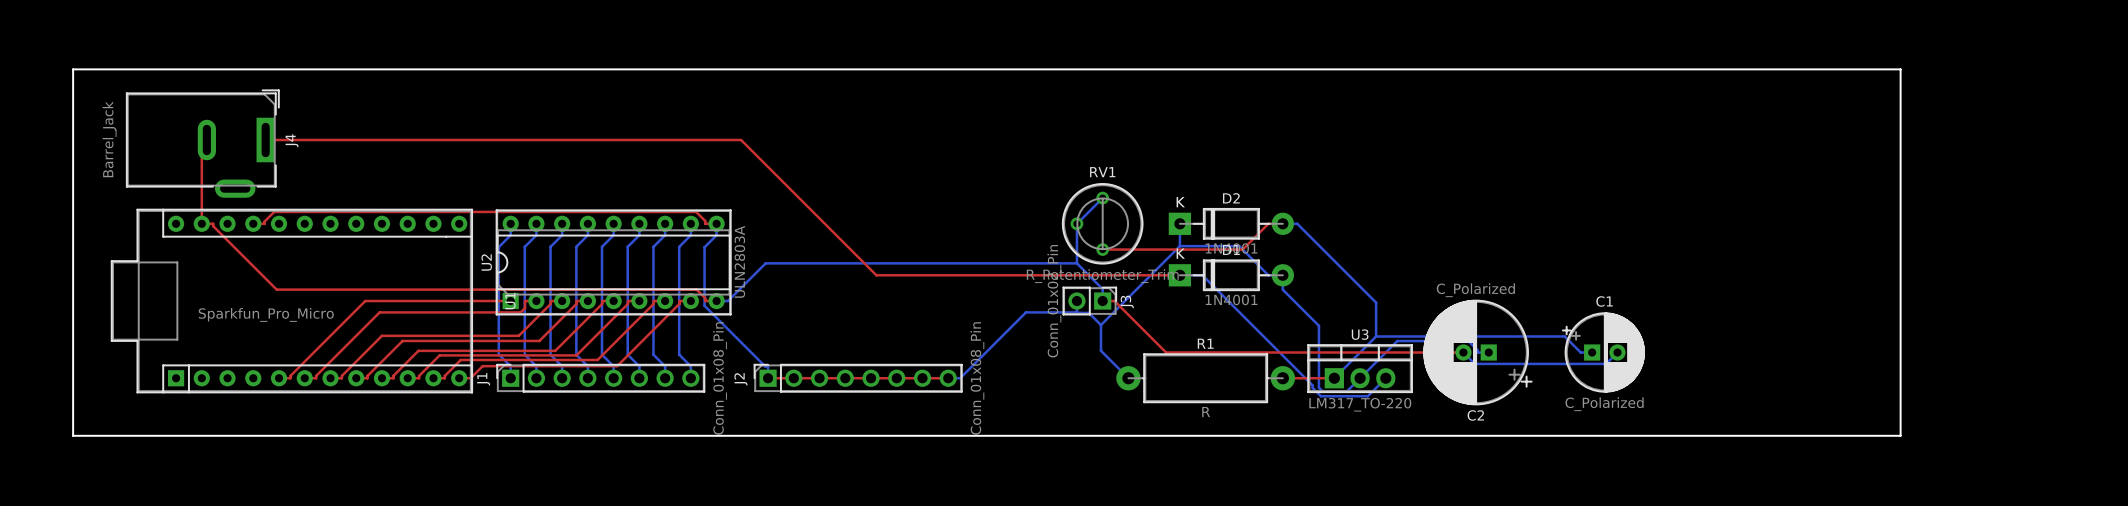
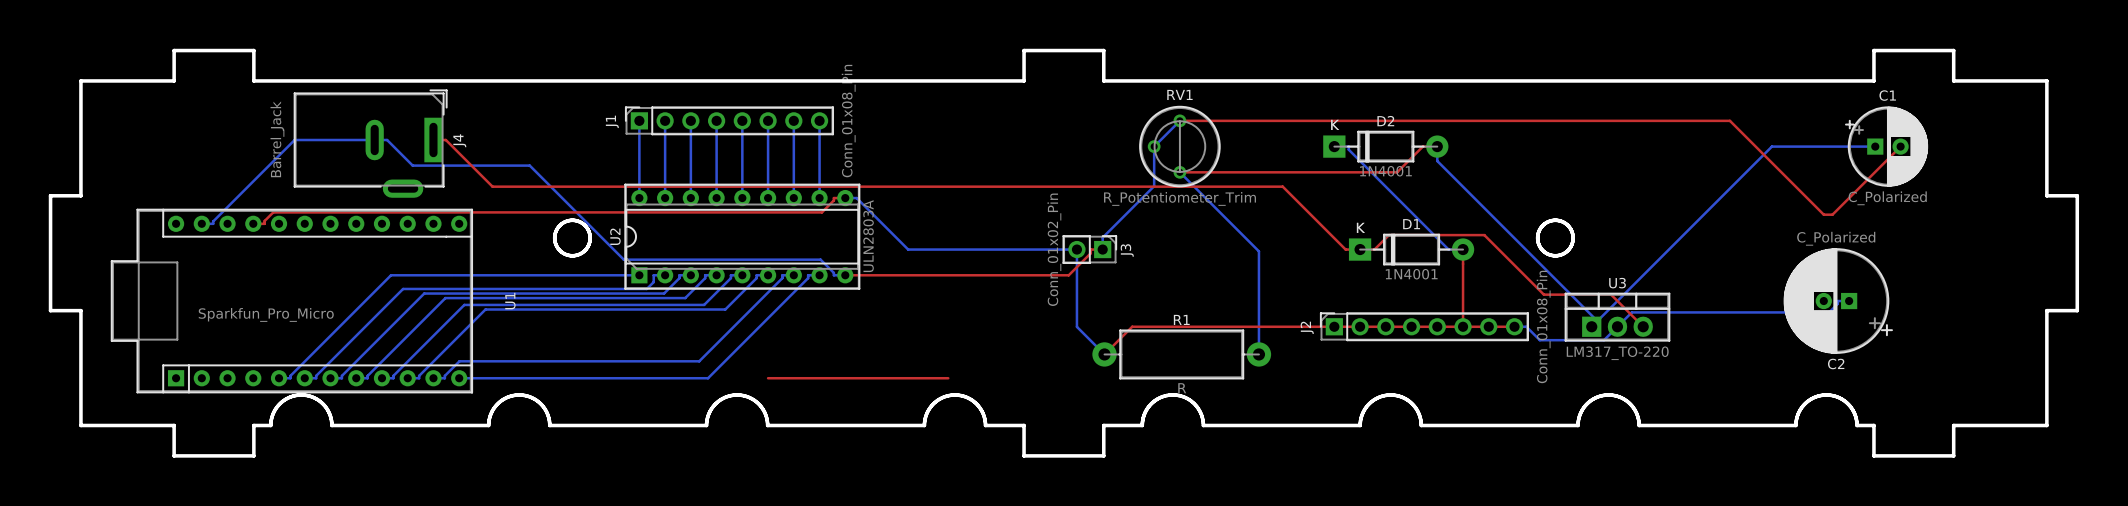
board edge: (73, 69) (1900, 69) (1900, 435) (73, 435) (73, 69) -> (174, 50) (174, 80) (80, 80) (80, 195) (50, 195) (50, 310) (80, 310) (80, 425) (174, 425) (174, 455) (253, 455) (253, 425) (270, 425) (273, 413) (279, 403) (289, 397) (301, 395) (313, 397) (322, 403) (329, 413) (331, 425) (488, 425) (491, 413) (497, 403) (507, 397) (519, 395) (531, 397) (540, 403) (547, 413) (549, 425) (706, 425) (708, 413) (715, 403) (725, 397) (737, 395) (748, 397) (758, 403) (765, 413) (767, 425) (924, 425) (926, 413) (934, 402) (944, 396) (956, 395) (968, 398) (977, 404) (983, 415) (985, 425) (1024, 425) (1024, 455) (1103, 455) (1103, 425) (1142, 425) (1144, 413) (1151, 403) (1161, 397) (1172, 394) (1184, 397) (1194, 403) (1201, 413) (1203, 425) (1360, 425) (1362, 413) (1369, 403) (1378, 397) (1390, 395) (1402, 397) (1412, 403) (1418, 413) (1421, 425) (1578, 425) (1580, 413) (1587, 403) (1596, 397) (1608, 395) (1620, 397) (1630, 403) (1636, 413) (1639, 425) (1795, 425) (1798, 413) (1805, 402) (1817, 396) (1829, 395) (1839, 398) (1849, 404) (1855, 415) (1857, 425) (1873, 425) (1873, 455) (1953, 455) (1953, 425) (2046, 425) (2046, 310) (2077, 310) (2077, 195) (2046, 195) (2046, 80) (1953, 80) (1953, 50) (1873, 50) (1873, 80) (1103, 80) (1103, 50) (1024, 50) (1024, 80) (253, 80) (253, 50) (174, 50)
bottom track: none -> (639, 120) (639, 198)
bottom track: none -> (665, 120) (665, 198)
bottom track: none -> (690, 120) (690, 198)
bottom track: none -> (716, 120) (716, 198)
bottom track: none -> (742, 120) (742, 198)
bottom track: none -> (768, 120) (768, 198)
bottom track: none -> (793, 120) (793, 198)
bottom track: none -> (819, 120) (819, 198)
top track: none -> (1179, 120) (1729, 120) (1823, 214) (1832, 214) (1900, 146)
bottom track: none -> (1179, 120) (1154, 146) (1154, 186) (1102, 237) (1102, 249)
top track: (201, 140) (201, 223) (213, 223) (213, 226) (276, 289) (696, 289) (705, 298) (705, 301) (716, 301) -> none
top track: (265, 140) (433, 140) -> none
top track: (445, 140) (741, 140) (876, 275) -> (845, 275) (876, 275)
top track: none -> (445, 140) (492, 186) (1282, 186) (1345, 249) (1374, 249) (1388, 235) (1484, 235) (1543, 294) (1611, 294) (1643, 326)
J4 position: (202, 143) -> (370, 143)
bottom track: none -> (1334, 146) (1348, 146) (1348, 149) (1448, 249) (1463, 249)
top track: none -> (1437, 146) (1422, 146) (1397, 172) (1179, 172)
bottom track: none -> (1437, 146) (1437, 161) (1597, 321)
bottom track: none -> (1875, 146) (1771, 146) (1591, 326)
bottom track: none -> (1179, 172) (1258, 251) (1258, 354)
bottom track: (1102, 198) (1076, 223) (1076, 249) -> (845, 198) (856, 198) (908, 249) (1076, 249)
board edge: none -> (571, 220) (559, 226) (554, 238) (560, 251) (573, 255) (585, 249) (590, 237) (584, 224) (571, 220)
board edge: none -> (1554, 220) (1542, 226) (1537, 238) (1543, 251) (1556, 255) (1568, 249) (1573, 237) (1567, 224) (1554, 220)
top track: (264, 221) (274, 211) (696, 211) (705, 220) (705, 223) (716, 223) -> (264, 221) (273, 212) (821, 212) (833, 200) (833, 198) (845, 198)
bottom track: none -> (201, 223) (213, 223) (213, 221) (294, 140) (387, 140) (412, 165) (529, 165) (623, 259) (820, 259) (833, 272) (833, 275) (845, 275)
bottom track: (510, 223) (510, 235) (498, 247) (498, 354) (510, 366) (510, 378) -> none
bottom track: (536, 223) (536, 235) (524, 246) (524, 354) (536, 366) (536, 378) -> none
bottom track: (562, 223) (562, 235) (550, 246) (550, 354) (562, 366) (562, 378) -> none
bottom track: (587, 223) (587, 235) (576, 246) (576, 354) (587, 366) (587, 378) -> none
bottom track: (613, 223) (613, 235) (601, 246) (601, 354) (613, 366) (613, 378) -> none
bottom track: (639, 223) (639, 235) (627, 246) (627, 354) (639, 366) (639, 378) -> none
bottom track: (665, 223) (665, 235) (653, 246) (653, 354) (665, 366) (665, 378) -> none
bottom track: (690, 223) (690, 235) (679, 246) (679, 354) (690, 366) (690, 378) -> none
bottom track: (716, 223) (716, 235) (704, 247) (704, 305) (765, 366) (768, 366) (768, 378) -> none
RV1 position: (1102, 223) -> (1179, 146)
bottom track: (1179, 223) (1179, 246) -> none
D2 position: (1231, 223) -> (1385, 146)
top track: (1282, 223) (1268, 223) (1242, 249) (1102, 249) -> none
bottom track: (1282, 223) (1297, 223) (1376, 302) (1376, 336) -> none
bottom track: (1179, 246) (1239, 246) (1268, 275) (1282, 275) (1282, 289) (1318, 325) (1318, 387) (1322, 391) (1346, 391) (1397, 341) (1468, 341) (1477, 350) (1477, 352) (1488, 352) -> none
bottom track: (1179, 246) (1100, 325) -> none
top track: none -> (1463, 249) (1463, 326)
U2 position: (613, 262) -> (742, 236)
bottom track: none -> (1076, 263) (1076, 301)
bottom track: none -> (639, 275) (391, 275) (290, 375) (290, 378) (279, 378)
bottom track: none -> (665, 275) (653, 275) (653, 282) (646, 288) (403, 288) (316, 375) (316, 378) (304, 378)
bottom track: none -> (690, 275) (679, 275) (679, 278) (664, 293) (424, 293) (341, 375) (341, 378) (330, 378)
bottom track: none -> (716, 275) (705, 275) (705, 278) (685, 298) (445, 298) (367, 375) (367, 378) (356, 378)
bottom track: none -> (742, 275) (730, 275) (730, 278) (704, 304) (464, 304) (393, 375) (393, 378) (381, 378)
bottom track: none -> (768, 275) (756, 275) (756, 278) (725, 309) (485, 309) (419, 375) (419, 378) (407, 378)
bottom track: none -> (793, 275) (782, 275) (782, 278) (699, 361) (459, 361) (444, 375) (444, 378) (433, 378)
bottom track: none -> (819, 275) (808, 275) (808, 278) (708, 378) (459, 378)
top track: (1068, 275) (1179, 275) -> (1068, 275) (1090, 253) (1090, 249) (1102, 249)
bottom track: (1179, 275) (1202, 275) (1312, 385) (1321, 396) (1367, 396) (1385, 378) -> none
D1 position: (1231, 275) -> (1411, 249)
top track: (510, 301) (365, 301) (290, 375) (290, 378) (279, 378) -> none
top track: (536, 301) (525, 301) (525, 308) (520, 312) (379, 312) (316, 375) (316, 378) (304, 378) -> none
top track: (562, 301) (550, 301) (550, 303) (518, 335) (381, 335) (341, 375) (341, 378) (330, 378) -> none
top track: (587, 301) (576, 301) (576, 303) (539, 340) (402, 340) (367, 375) (367, 378) (356, 378) -> none
top track: (613, 301) (602, 301) (602, 303) (555, 350) (418, 350) (393, 375) (393, 378) (381, 378) -> none
top track: (639, 301) (627, 301) (627, 303) (576, 355) (439, 355) (419, 375) (419, 378) (407, 378) -> none
top track: (665, 301) (653, 301) (653, 303) (597, 359) (460, 359) (444, 375) (444, 378) (433, 378) -> none
top track: (690, 301) (679, 301) (679, 303) (617, 366) (482, 366) (470, 378) (459, 378) -> none
bottom track: (716, 301) (728, 301) (765, 263) (1076, 263) (1102, 289) (1102, 301) -> none
J3 position: (1089, 301) -> (1089, 249)
top track: (1102, 301) (1114, 301) (1166, 352) (1463, 352) -> none
bottom track: none -> (1849, 301) (1837, 301) (1837, 303) (1829, 312) (1631, 312) (1604, 340) (1539, 340) (1526, 326) (1514, 326)
bottom track: (1076, 312) (1088, 312) (1100, 325) -> (1076, 312) (1076, 326) (1104, 354)
bottom track: (1076, 312) (1025, 312) (960, 378) (948, 378) -> none
bottom track: (1100, 325) (1100, 350) (1128, 378) -> none
top track: none -> (1514, 326) (1132, 326) (1104, 354)
bottom track: (1376, 336) (1564, 336) (1580, 352) (1592, 352) -> none
bottom track: (1376, 336) (1334, 378) -> none
bottom track: (1463, 352) (1474, 363) (1606, 363) (1617, 352) -> none
C2 position: (1477, 352) -> (1838, 301)
C1 position: (1603, 352) -> (1886, 146)
U3 position: (1360, 368) -> (1617, 317)
J1 position: (600, 378) -> (729, 120)
J2 position: (858, 378) -> (1424, 326)
R1 position: (1205, 378) -> (1181, 354)
top track: (1282, 378) (1334, 378) -> none

